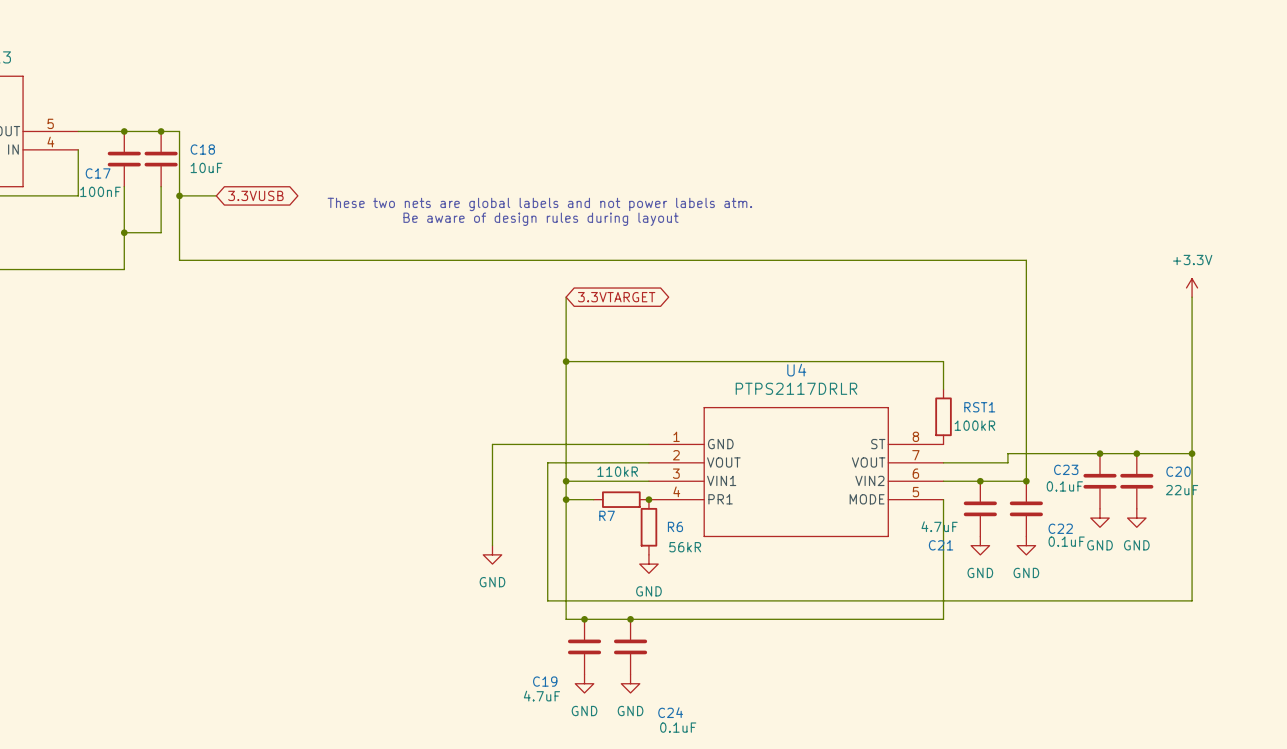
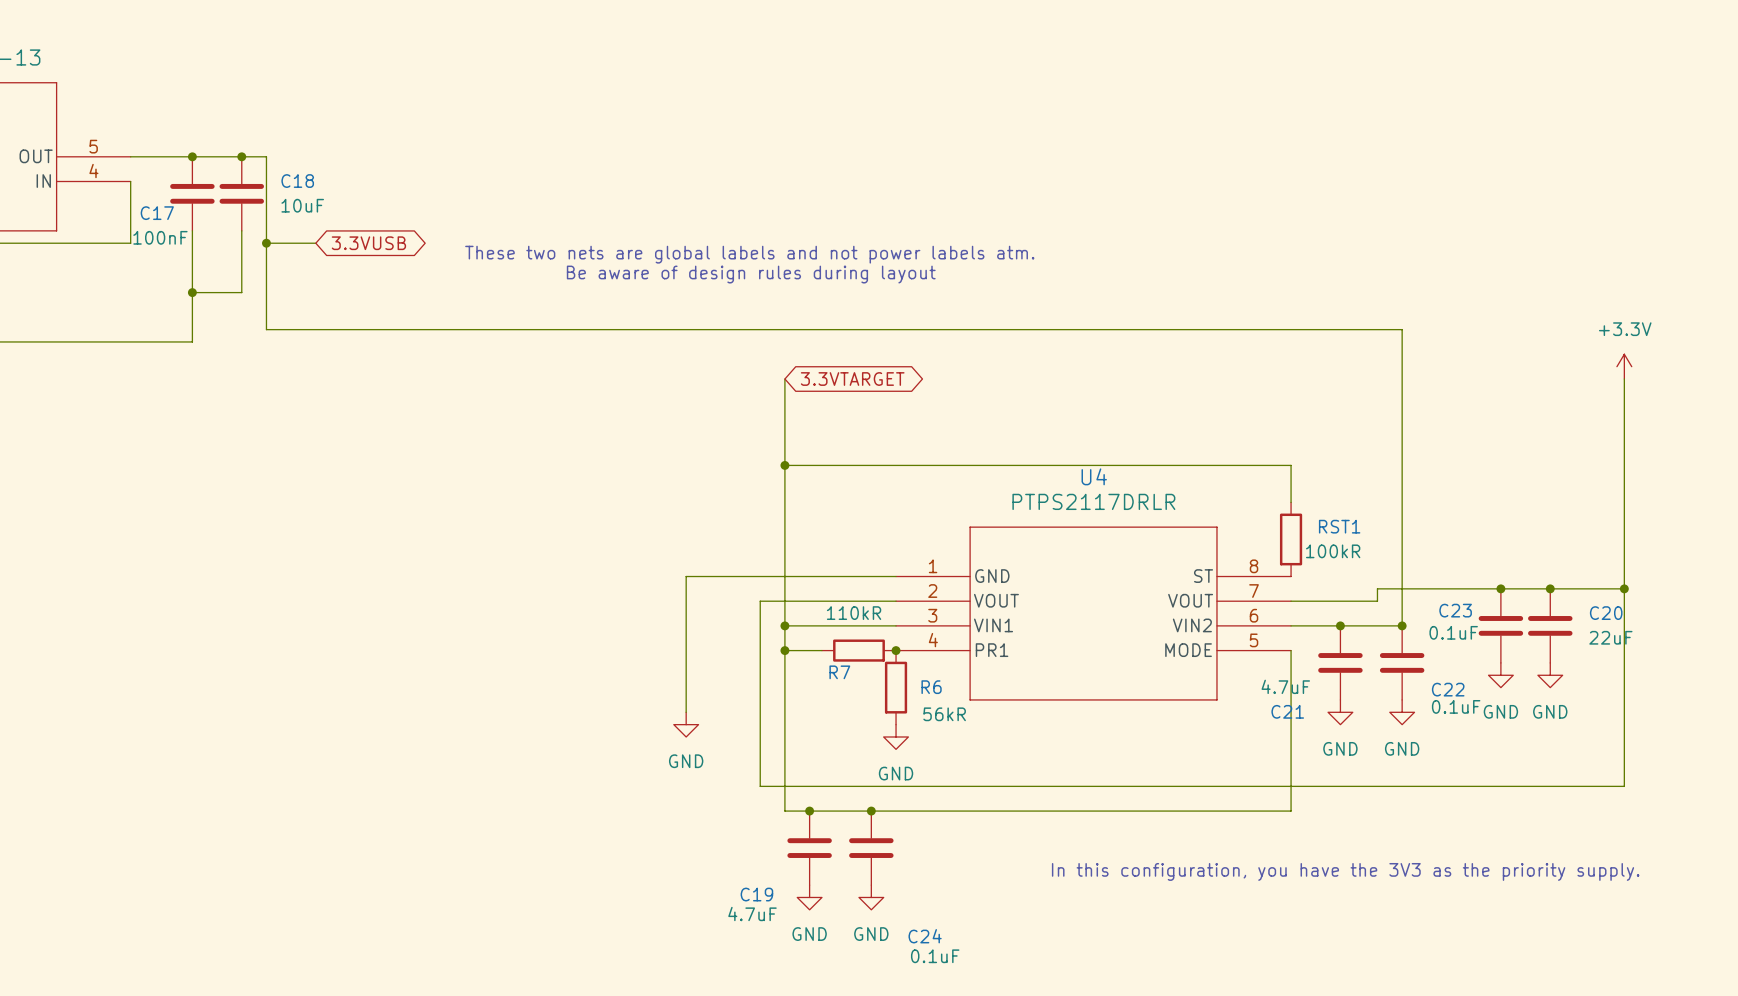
text: none -> In this configuration, you have the 3V3 as the priority supply. (1345, 871)

